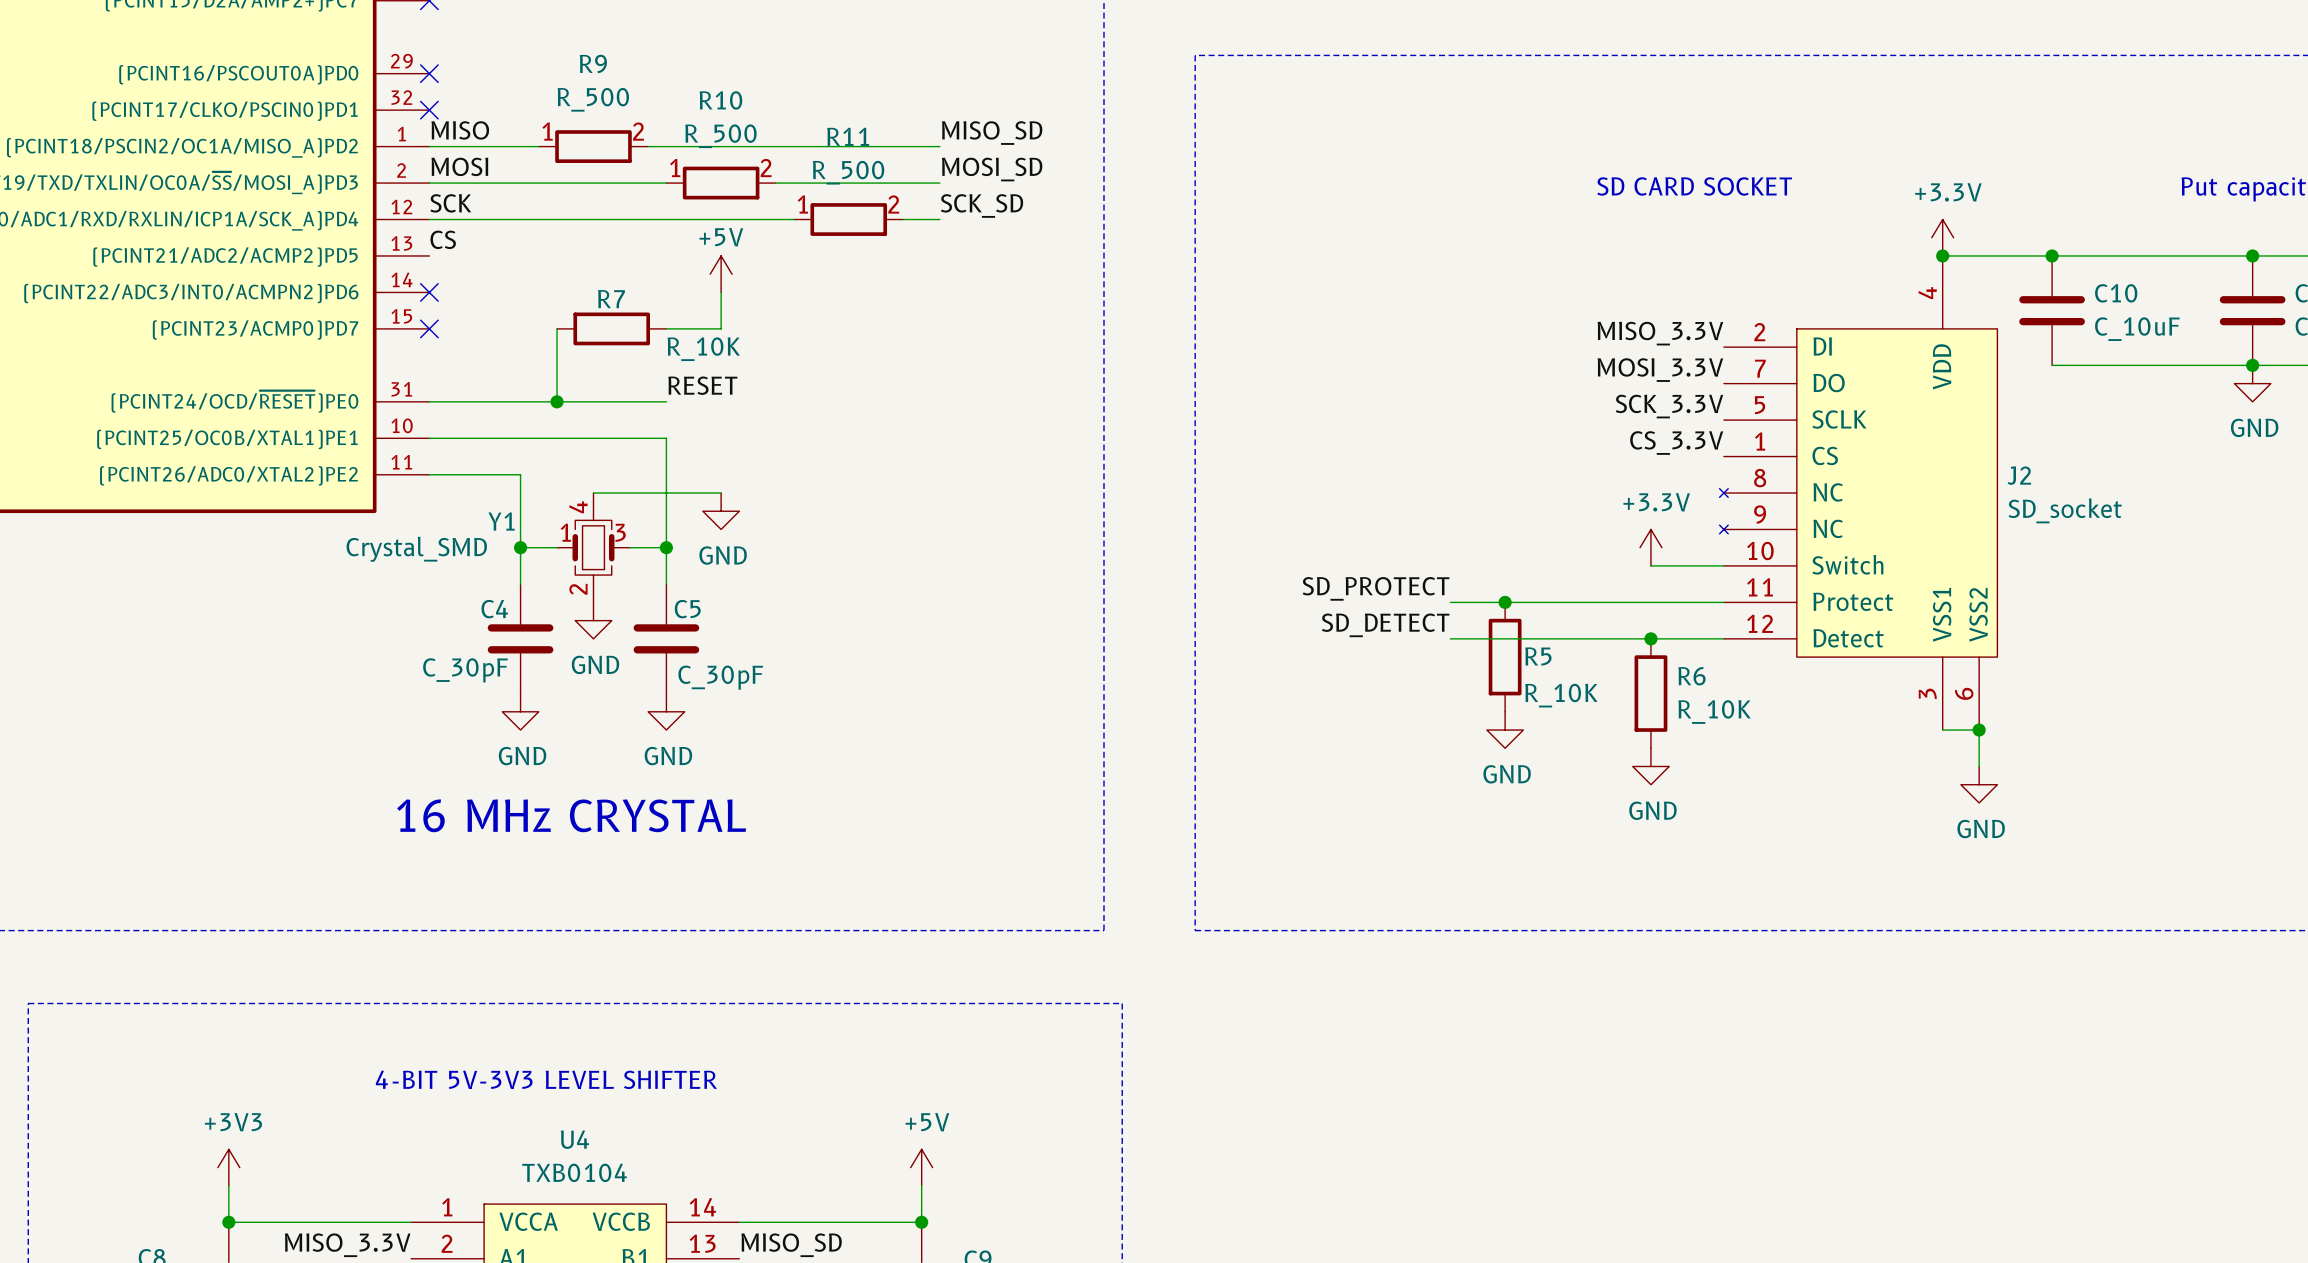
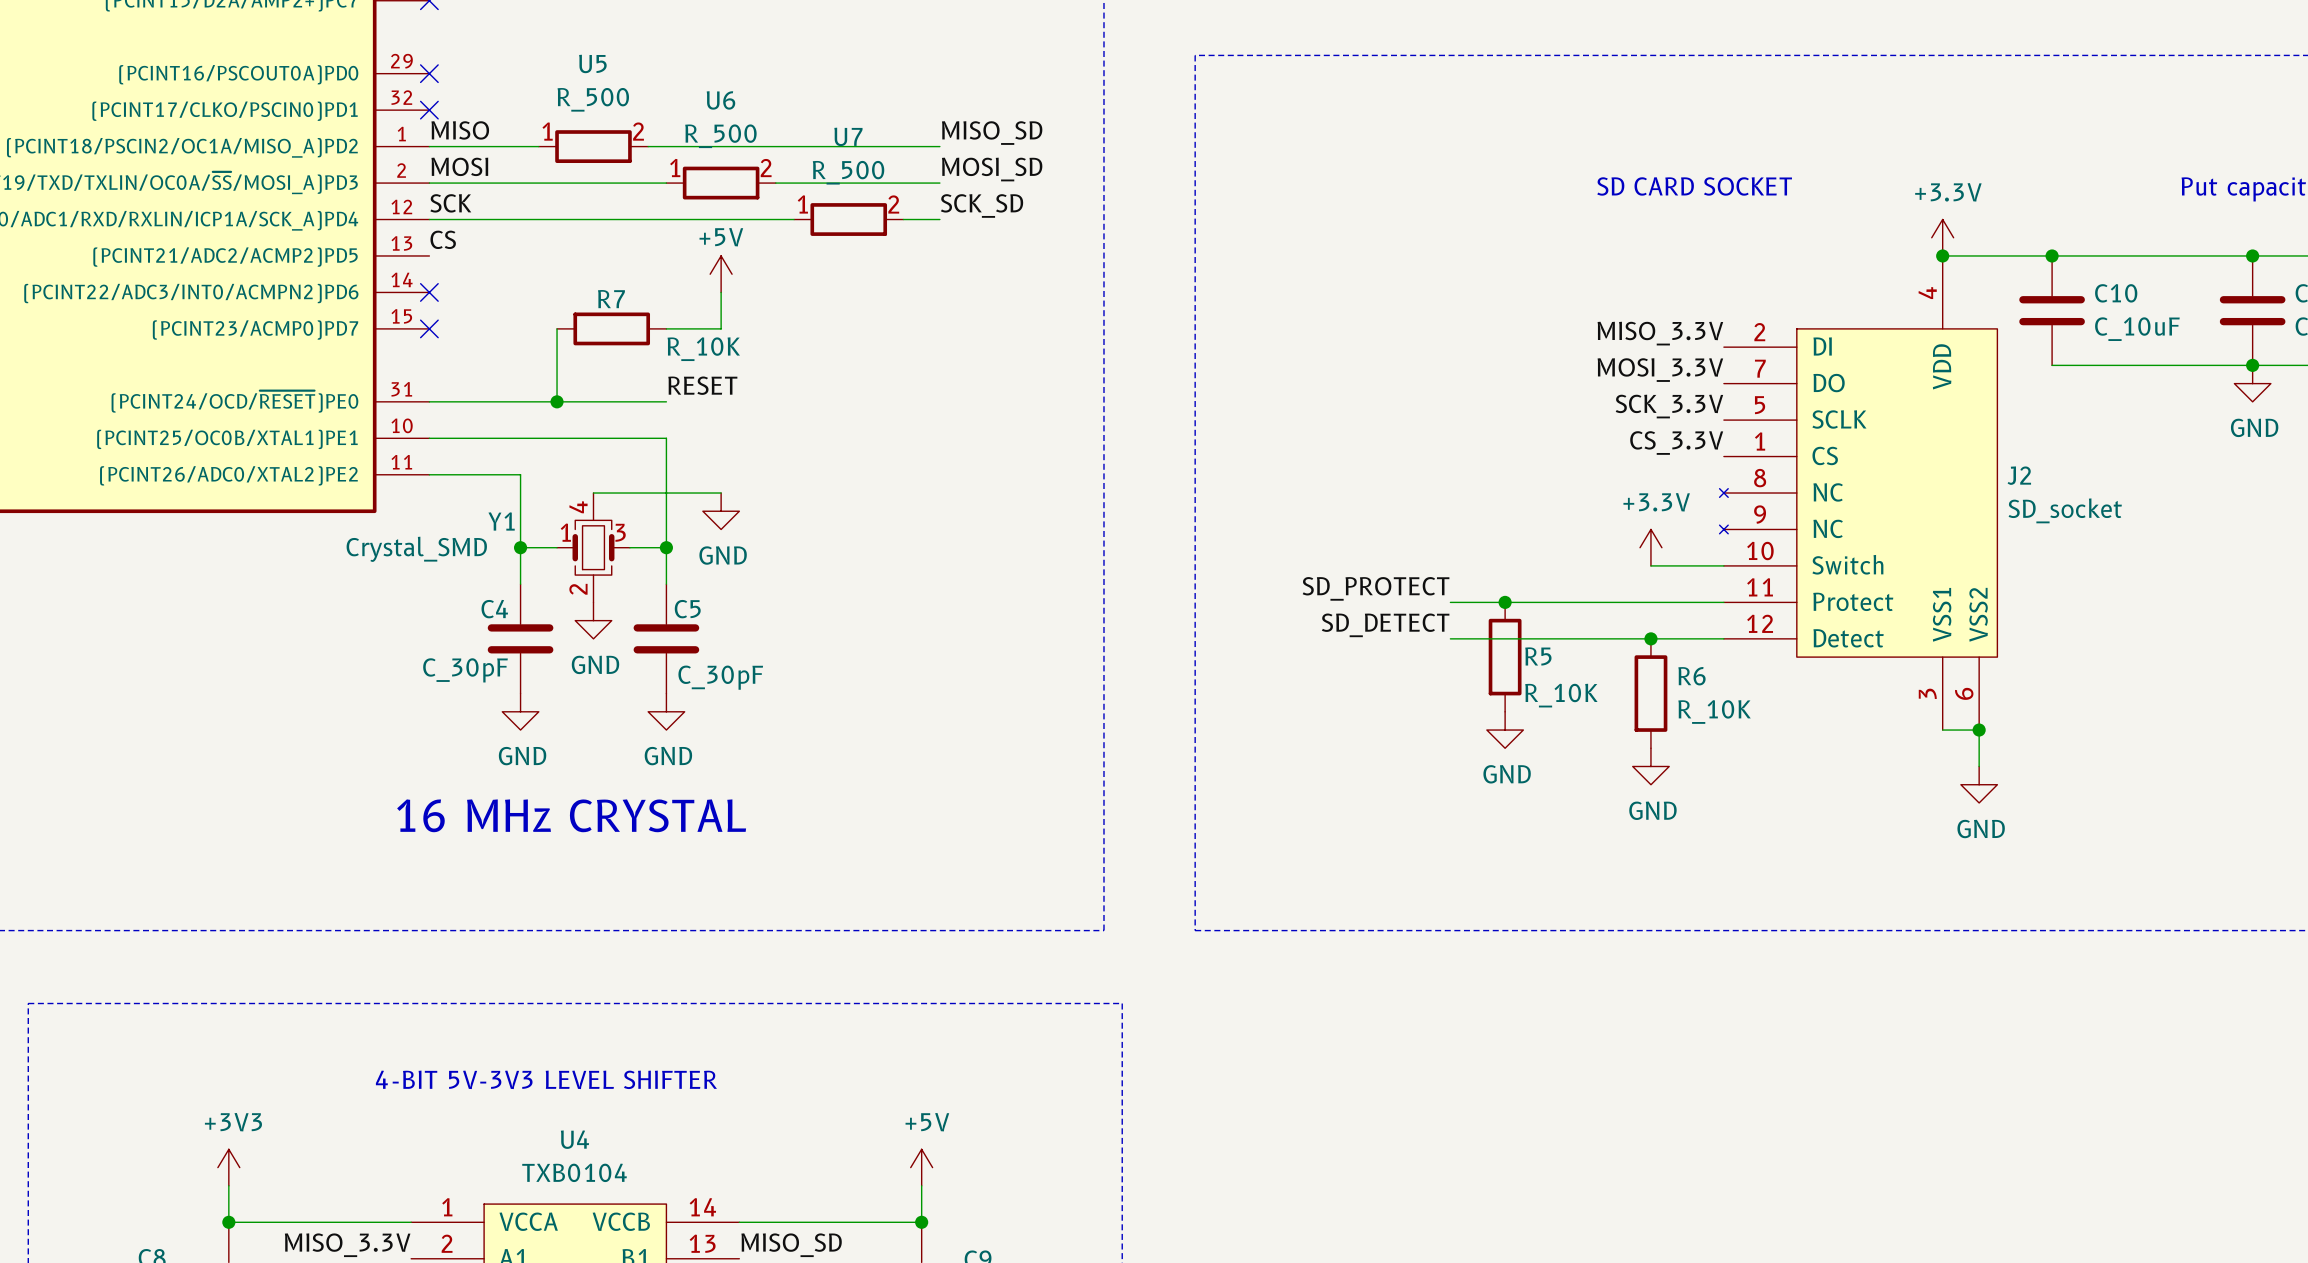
R9 name: R9 (593, 63) -> U5 (592, 63)
R10 name: R10 (720, 100) -> U6 (720, 100)
R11 name: R11 (848, 136) -> U7 (848, 136)

